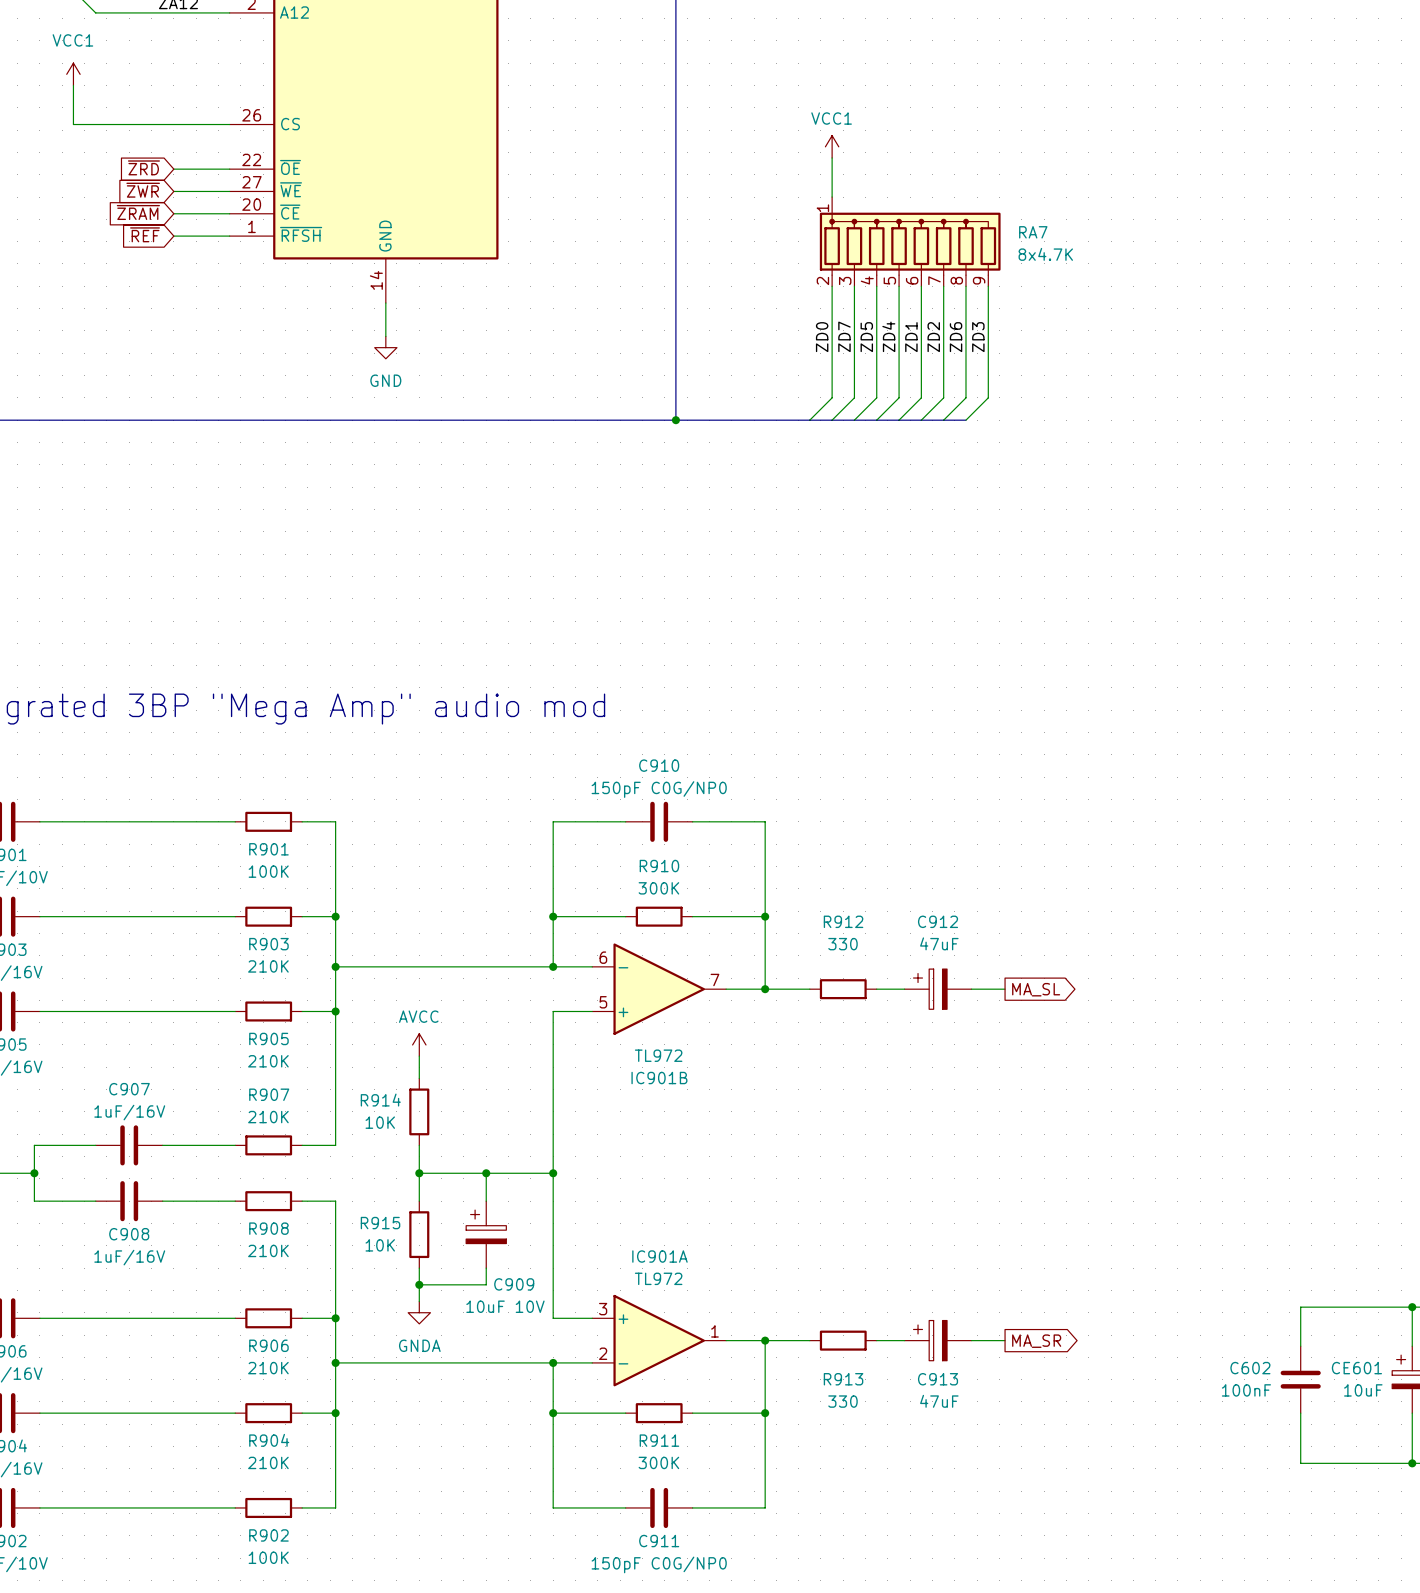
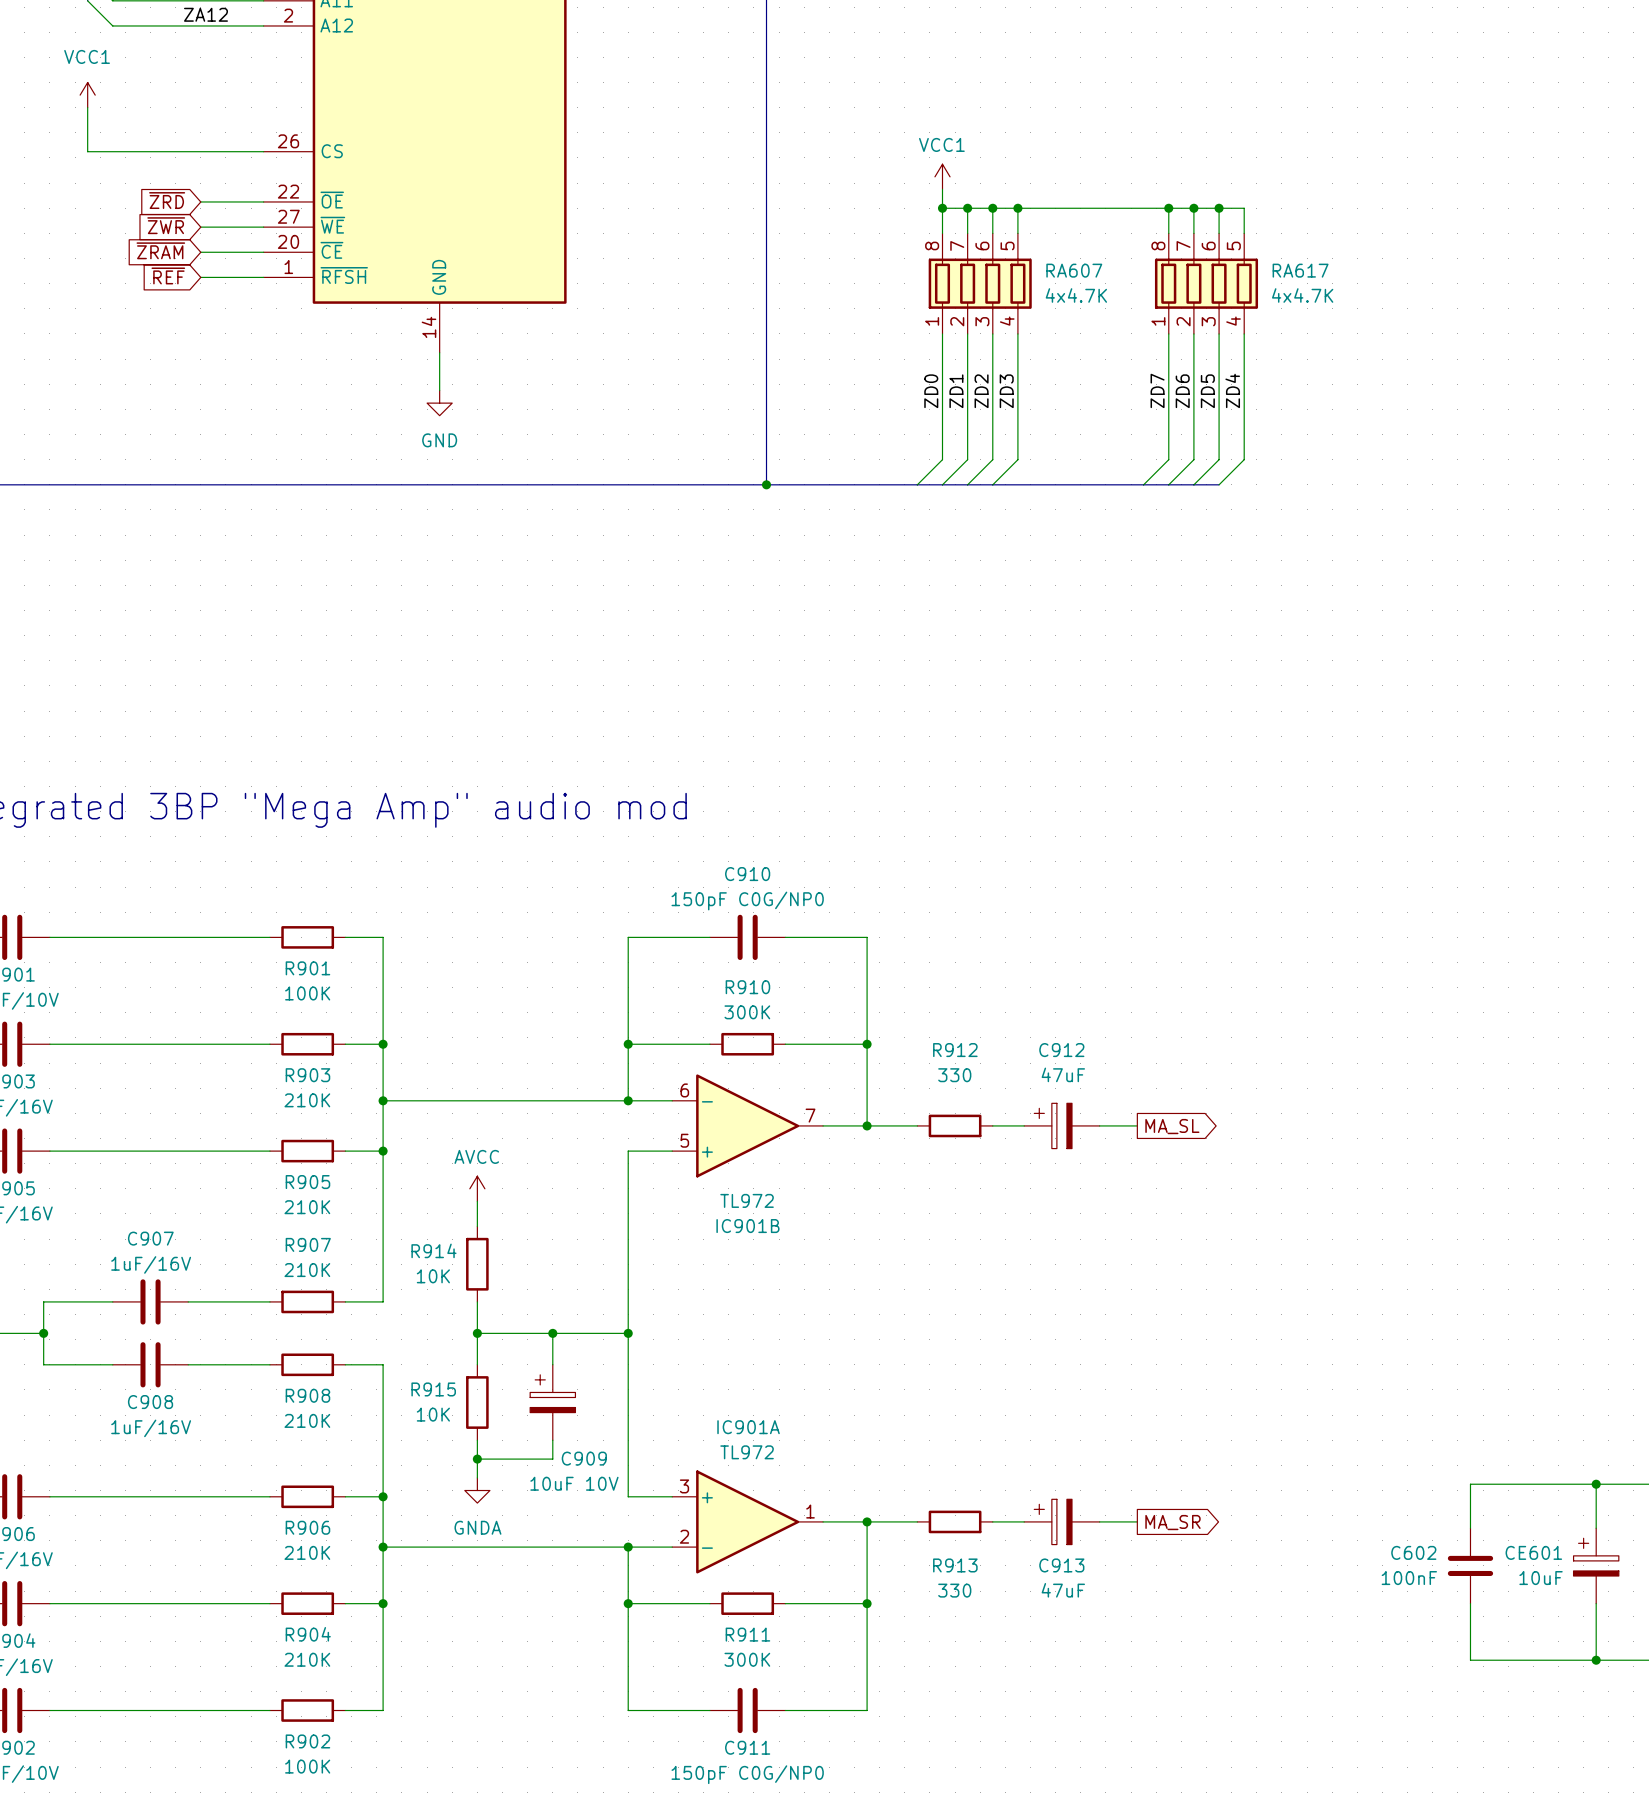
wire: none -> (942, 208) (1244, 208) (1244, 233)
junction: none -> (942, 208)
wire: none -> (967, 208) (967, 233)
junction: none -> (967, 208)
wire: none -> (992, 208) (992, 233)
junction: none -> (992, 208)
wire: none -> (1017, 208) (1017, 233)
junction: none -> (1017, 208)
wire: none -> (1168, 208) (1168, 233)
junction: none -> (1168, 208)
wire: none -> (1193, 208) (1193, 233)
junction: none -> (1193, 208)
wire: none -> (1219, 208) (1219, 233)
junction: none -> (1219, 208)
RA607: none -> 4x4.7K (980, 283)
RA7: 8x4.7K (910, 241) -> none
RA617: none -> 4x4.7K (1206, 283)
wire: (921, 286) (921, 397) (899, 420) -> (1168, 333) (1168, 459) (1143, 484)
wire: (943, 286) (943, 397) (921, 420) -> (1193, 333) (1193, 459) (1168, 484)
wire: (965, 286) (965, 397) (943, 420) -> (1219, 333) (1219, 459) (1193, 484)
wire: (988, 286) (988, 397) (965, 420) -> (1244, 333) (1244, 459) (1219, 484)
label: ZD7 (844, 336) -> ZD1 (956, 391)
label: ZD4 (888, 336) -> ZD3 (1006, 391)
label: none -> ZD7 (1157, 390)
label: none -> ZD4 (1232, 390)
label: ZD5 (866, 337) -> ZD2 (981, 391)
label: ZD1 (911, 337) -> none
label: ZD2 (933, 337) -> none
label position: ZD6 (956, 337) -> ZD6 (1182, 391)
label: ZD3 (978, 337) -> none
label: none -> ZD5 (1207, 391)
bus: none -> (1093, 484) (1219, 484)

